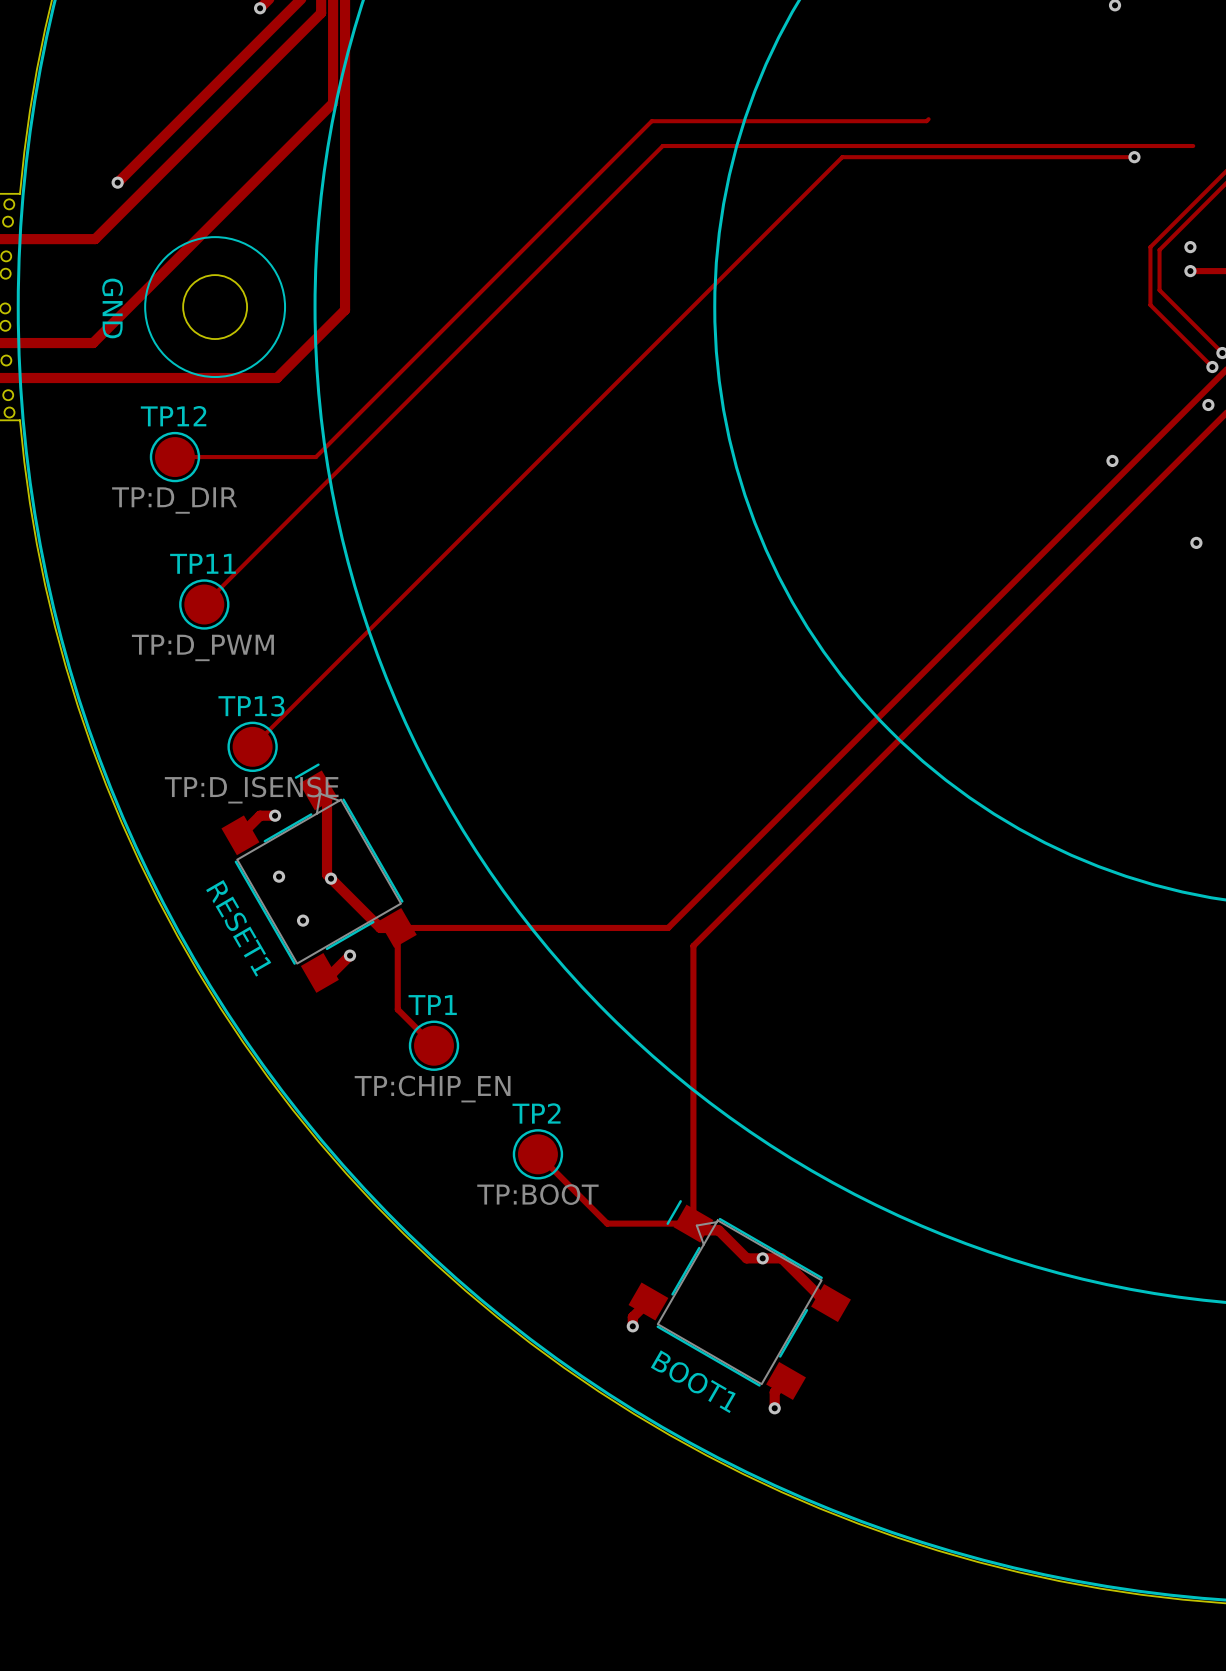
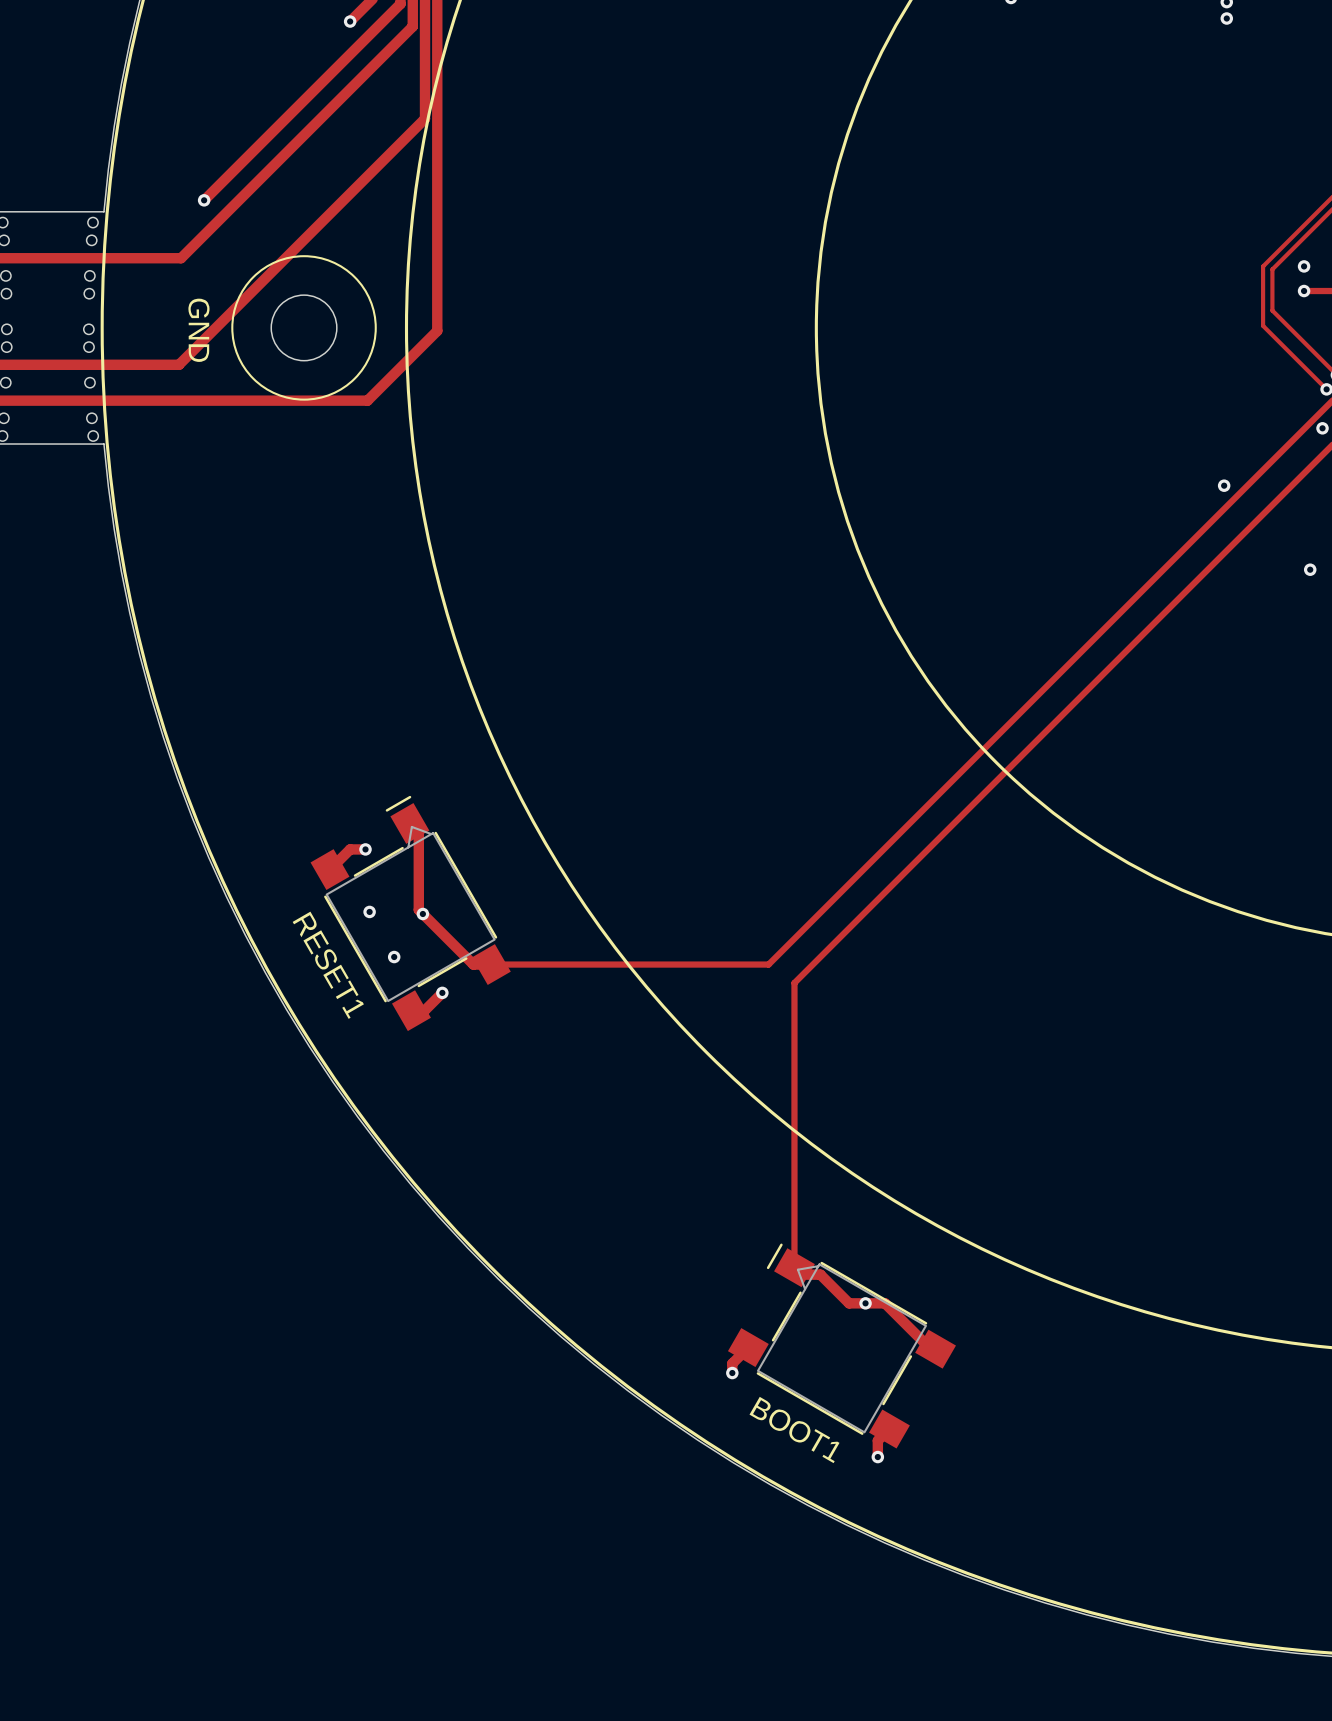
track: (928, 119) (926, 121) (651, 121) (315, 457) (174, 457) -> none
track: (1193, 145) (662, 145) (204, 604) -> none
track: (1134, 157) (842, 157) (252, 746) -> none
via: (1134, 157) -> none
TP12: TP:D_DIR (174, 457) -> none
TP11: TP:D_PWM (204, 604) -> none
TP13: TP:D_ISENSE (252, 746) -> none
track: (397, 927) (397, 1009) (434, 1045) -> none
TP1: TP:CHIP_EN (434, 1045) -> none
track: (537, 1154) (607, 1223) (693, 1223) -> none
TP2: TP:BOOT (537, 1154) -> none

